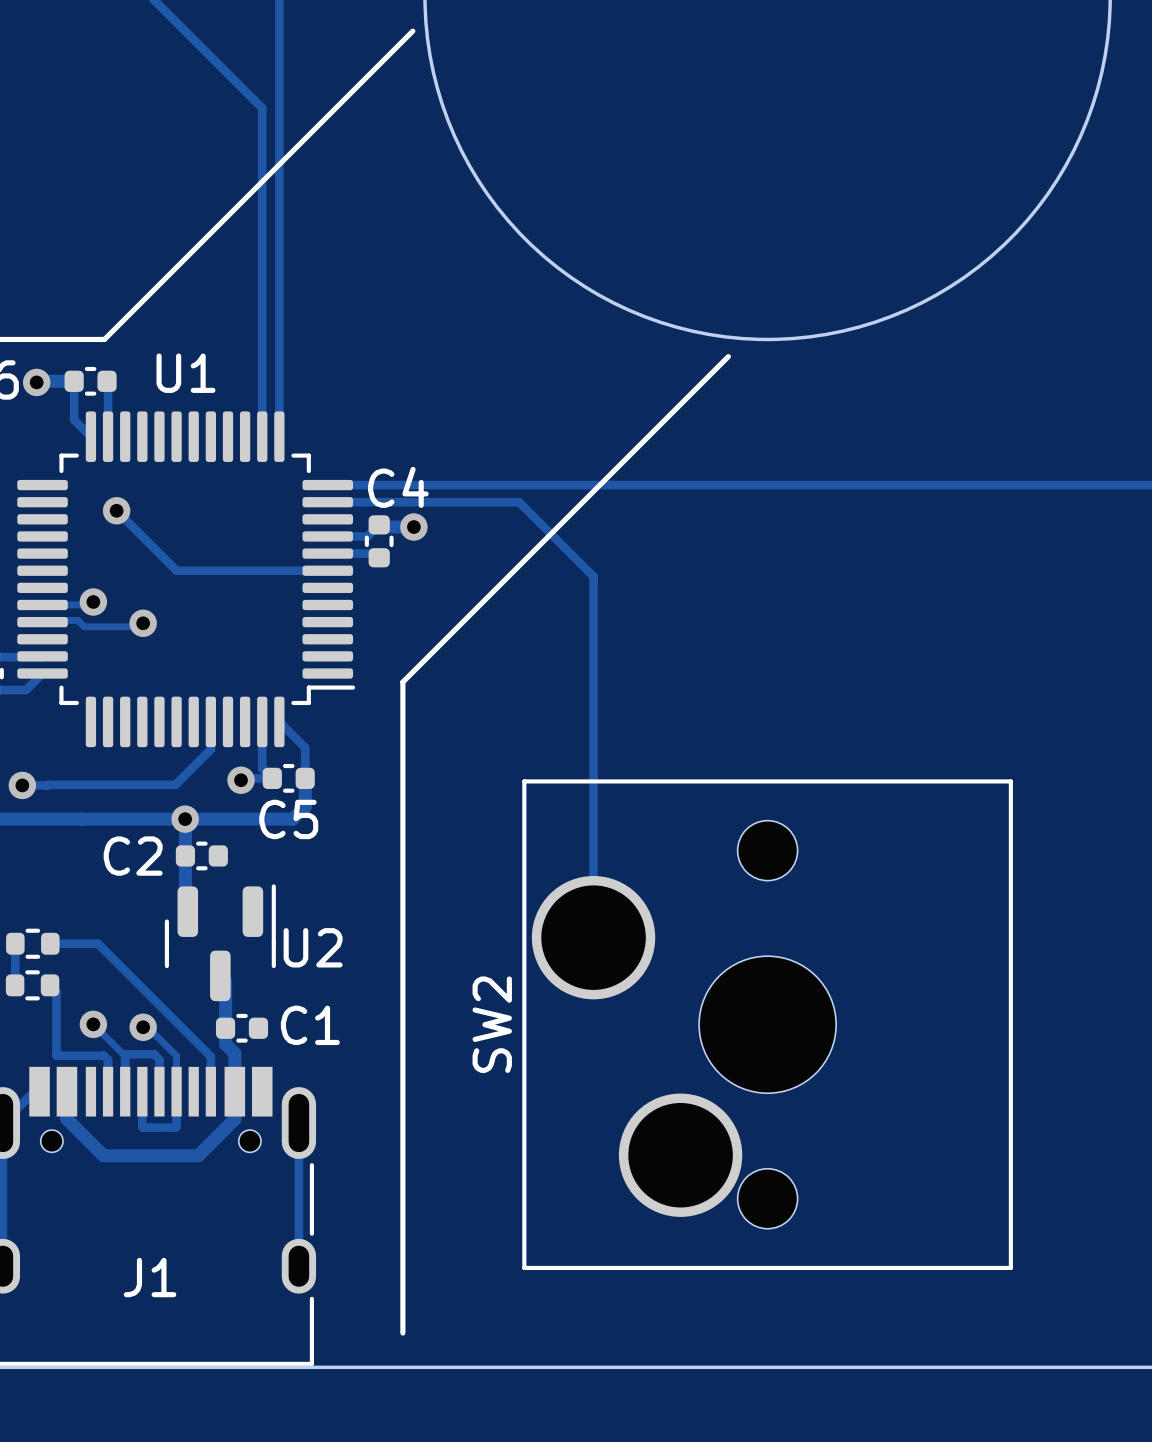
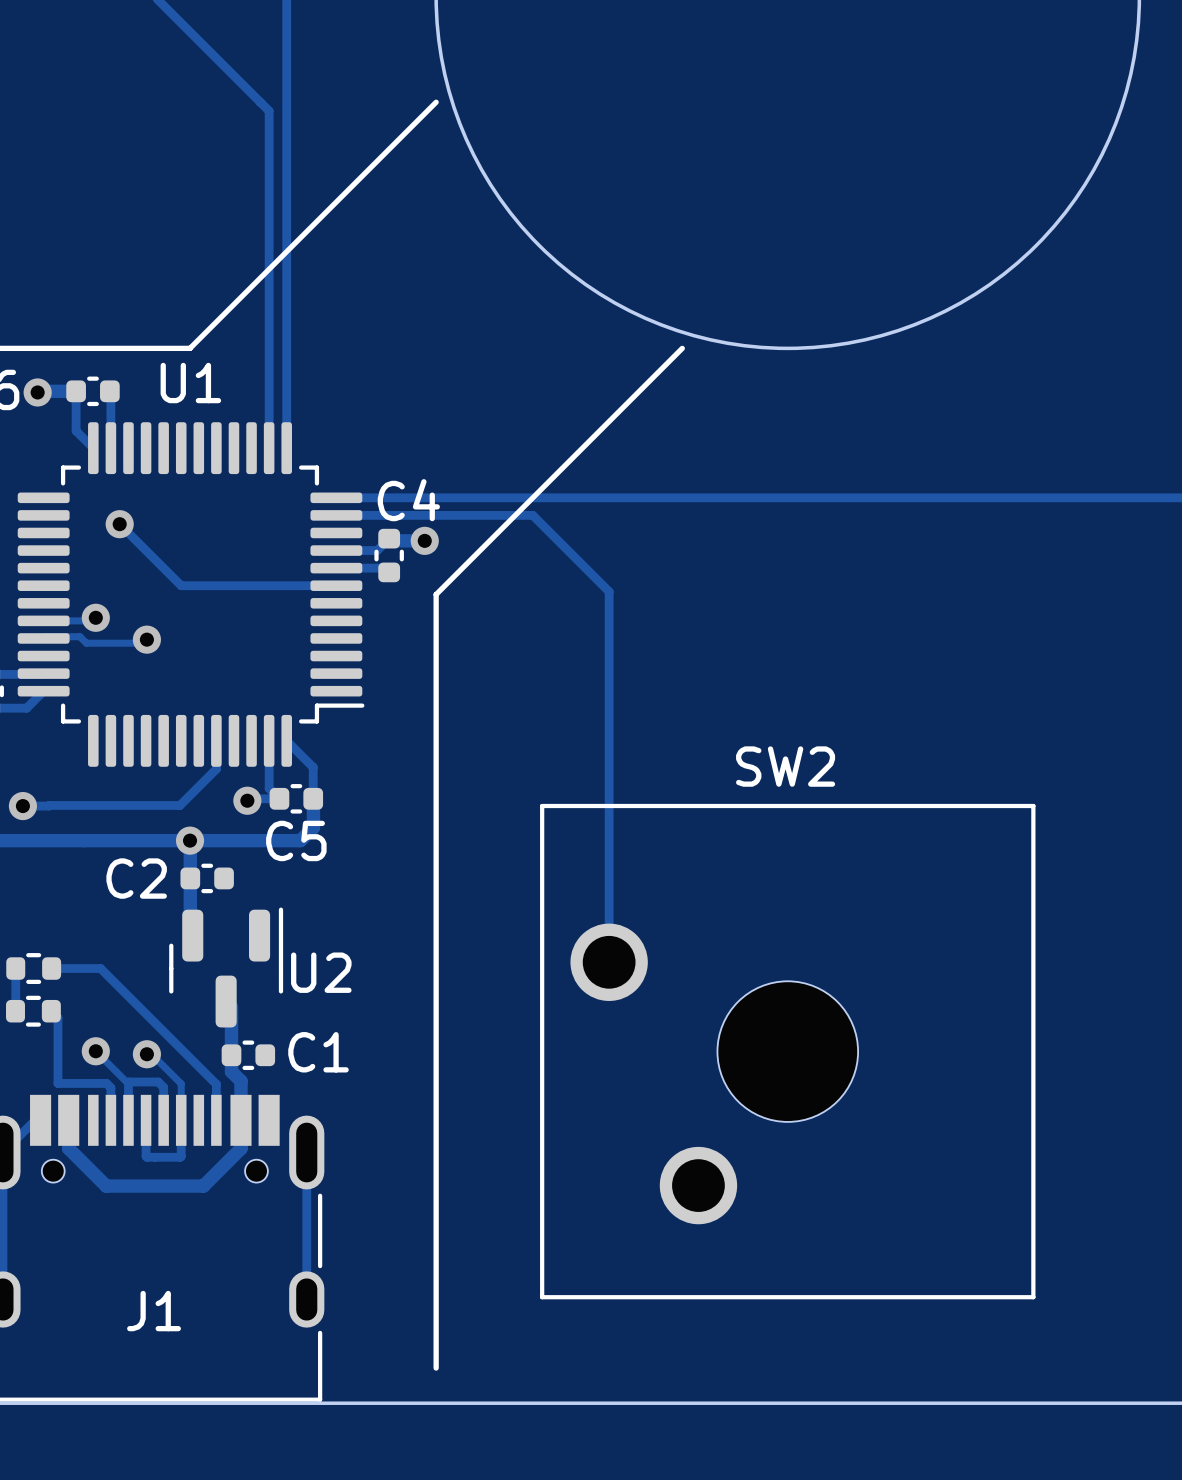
line: (412, 31) (104, 339) -> (436, 102) (190, 348) (107, 348)
line: none -> (682, 348) (436, 594) (436, 1368)
line: (728, 356) (402, 682) (402, 1333) -> none
SW2 footprint: [522, 779, 1013, 1271] -> [540, 803, 1036, 1300]
SW2 name position: SW2 (492, 1024) -> SW2 (785, 766)

